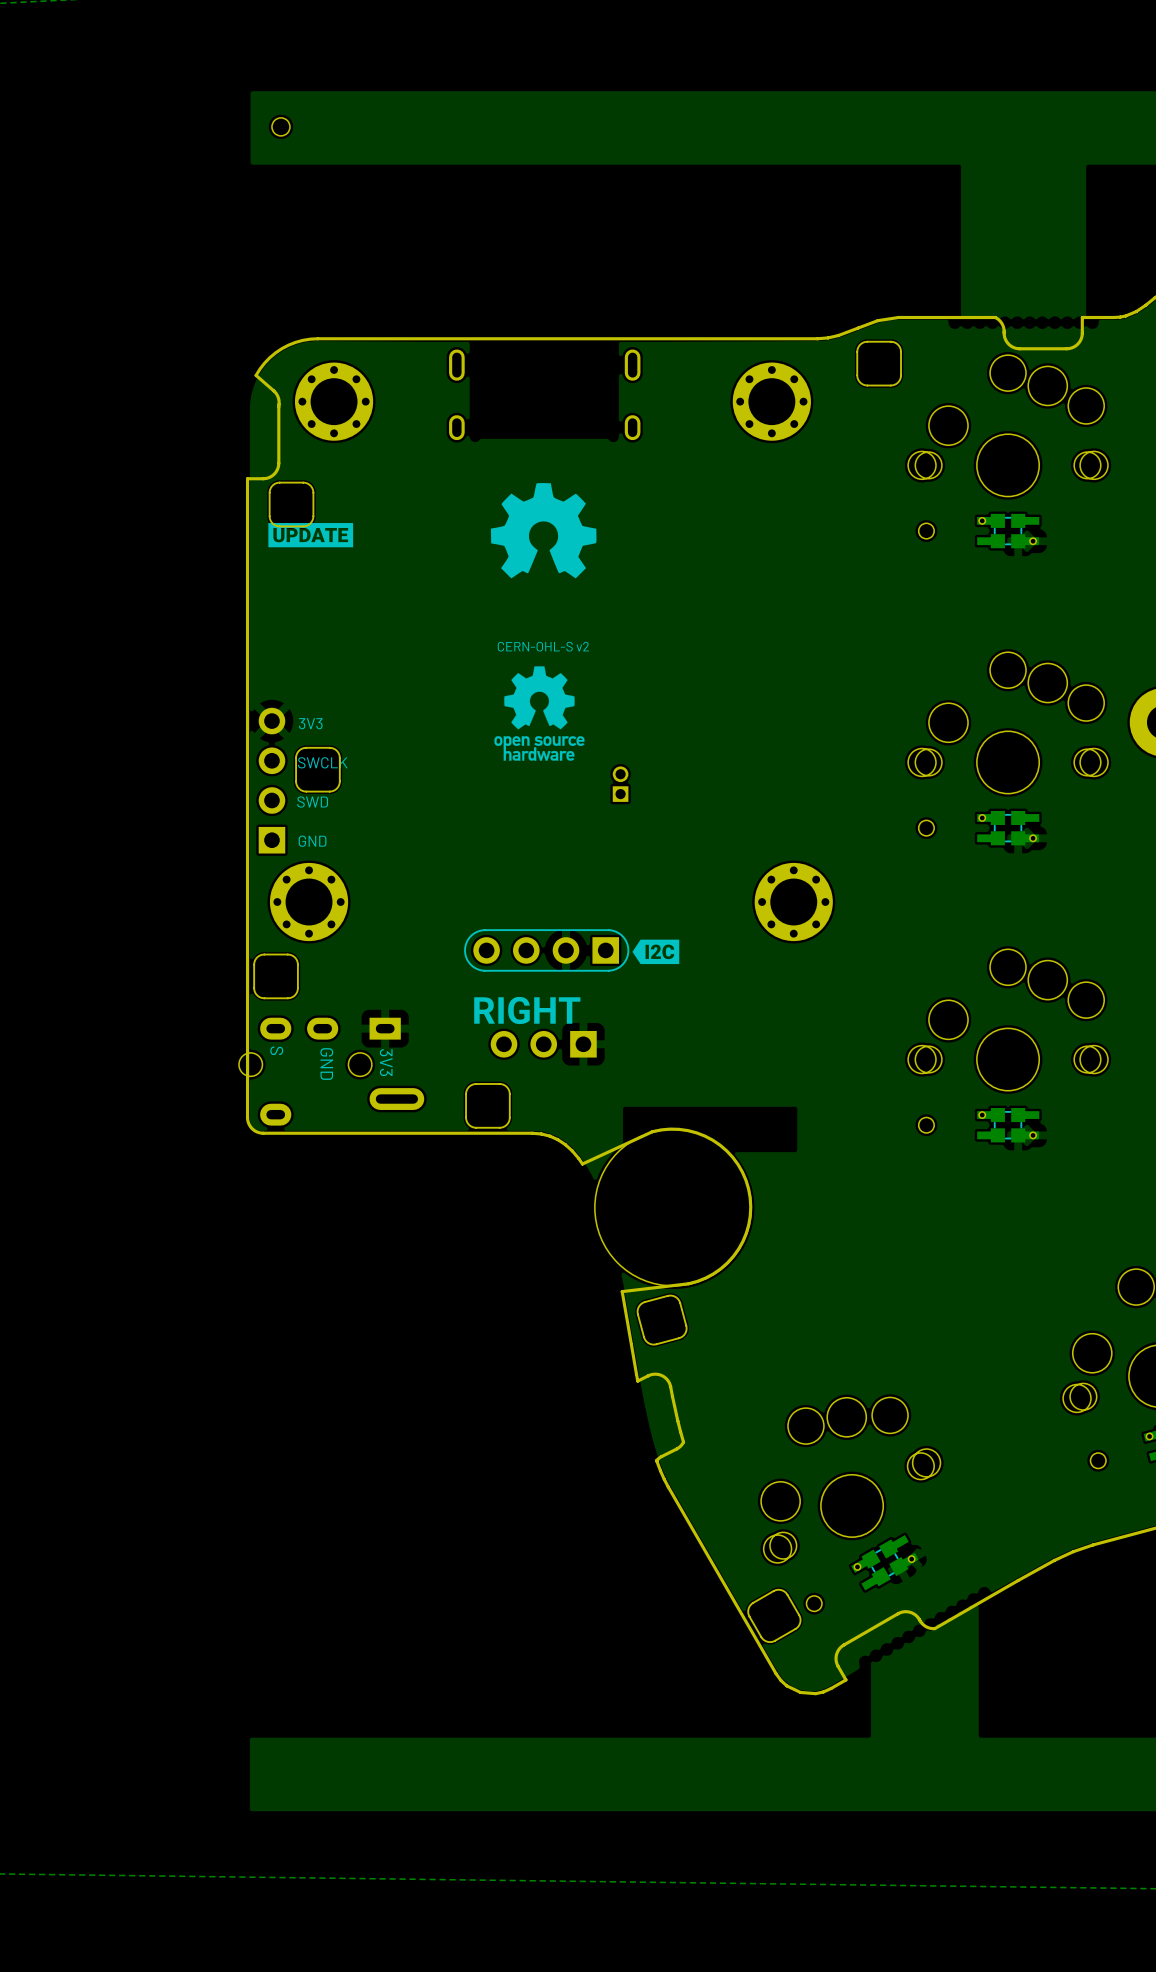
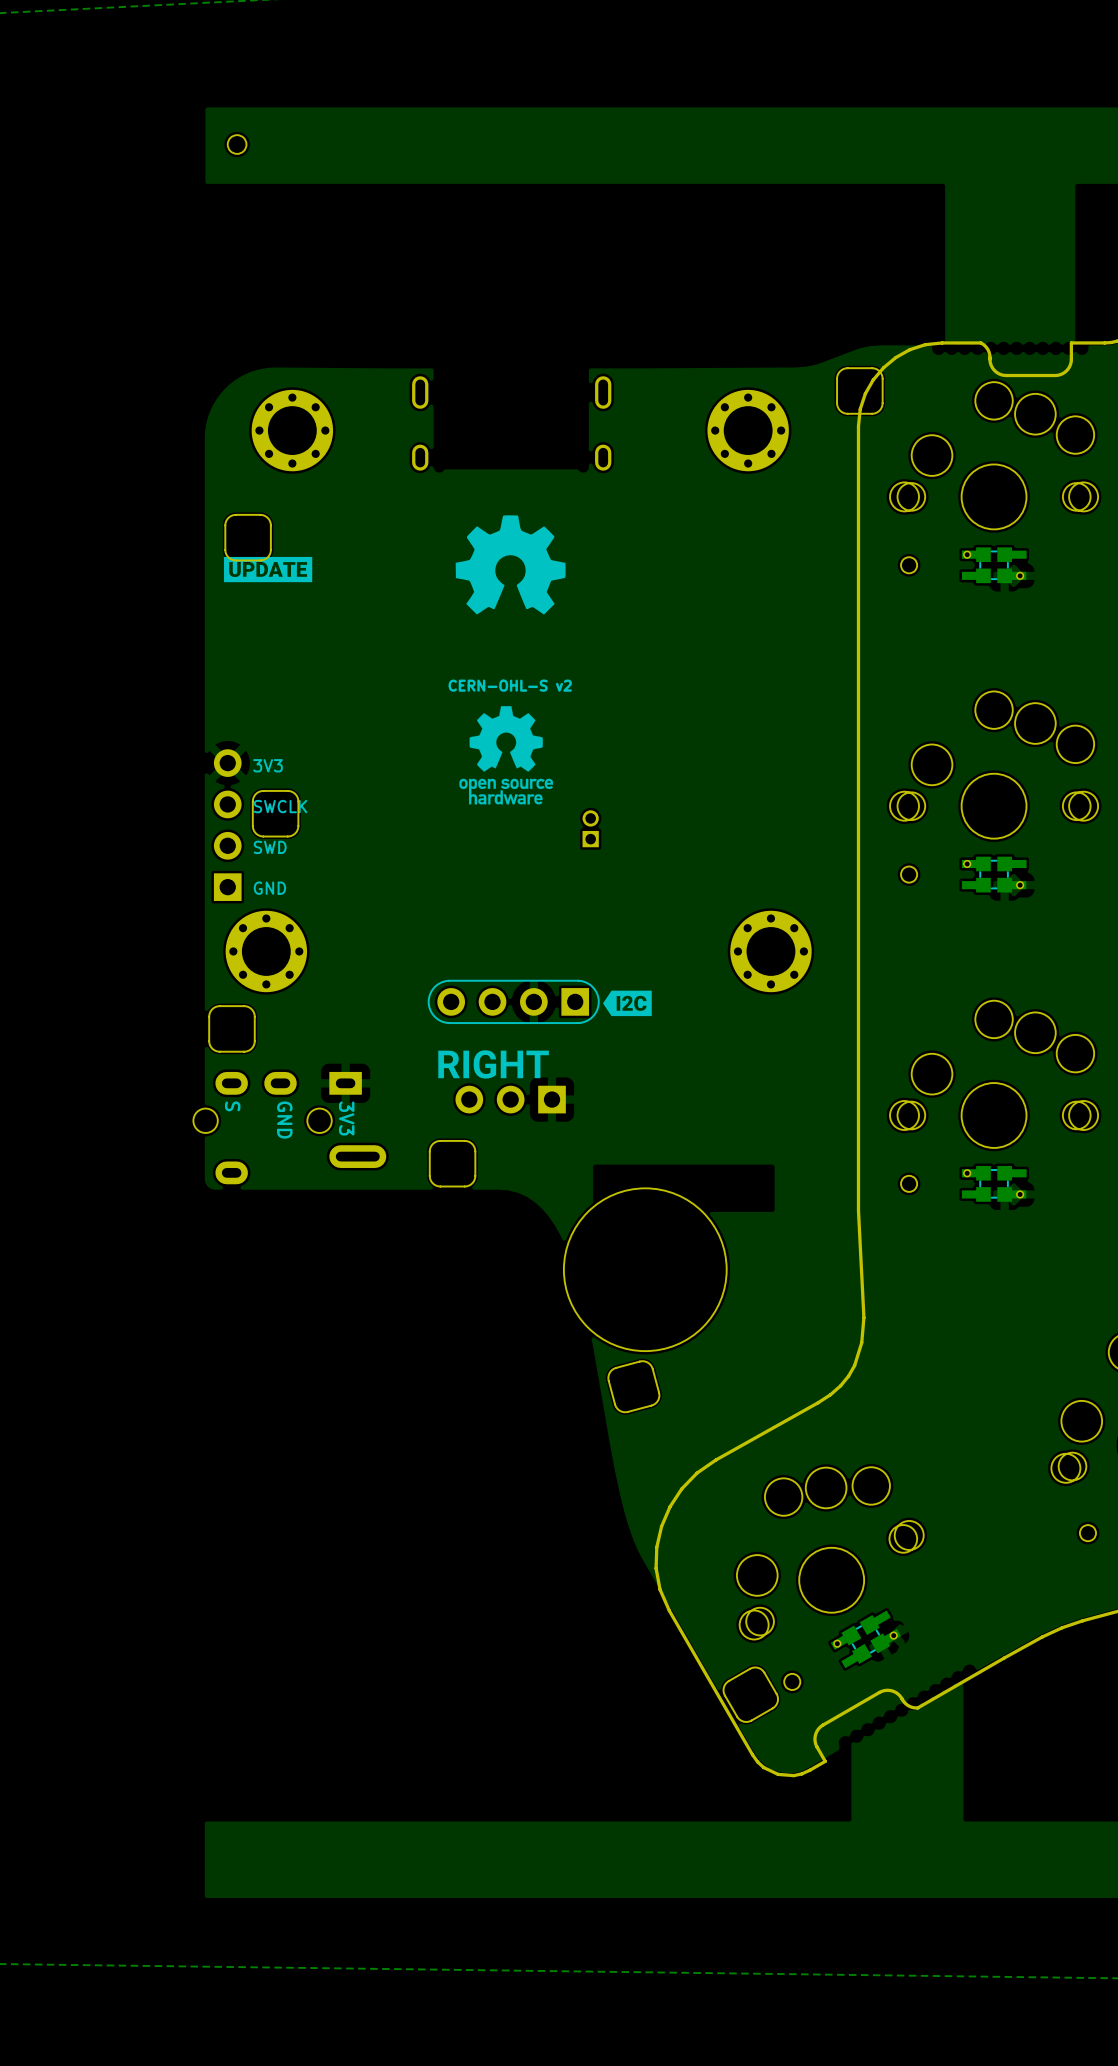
board edge: (958, 317) (898, 317) (877, 320) (838, 335) (817, 338) (310, 339) (295, 342) (275, 352) (264, 363) (256, 375) (275, 392) (278, 398) (278, 463) (276, 471) (269, 477) (247, 478) (248, 1123) (255, 1131) (263, 1133) (541, 1133) (549, 1136) (565, 1144) (582, 1164) (652, 1131) (661, 1129) (679, 1129) (696, 1132) (712, 1140) (726, 1150) (742, 1172) (750, 1197) (748, 1224) (742, 1241) (733, 1256) (720, 1268) (697, 1281) (622, 1291) (637, 1381) (649, 1375) (657, 1374) (665, 1377) (670, 1385) (683, 1442) (678, 1448) (656, 1460) (668, 1486) (696, 1535) -> (942, 342) (925, 344) (909, 349) (883, 367) (865, 393) (860, 409) (858, 426) (858, 1210) (863, 1317) (861, 1342) (854, 1365) (848, 1376) (830, 1394) (715, 1460) (697, 1473) (681, 1488) (669, 1506) (661, 1526) (656, 1547) (656, 1568) (660, 1589) (669, 1610)

